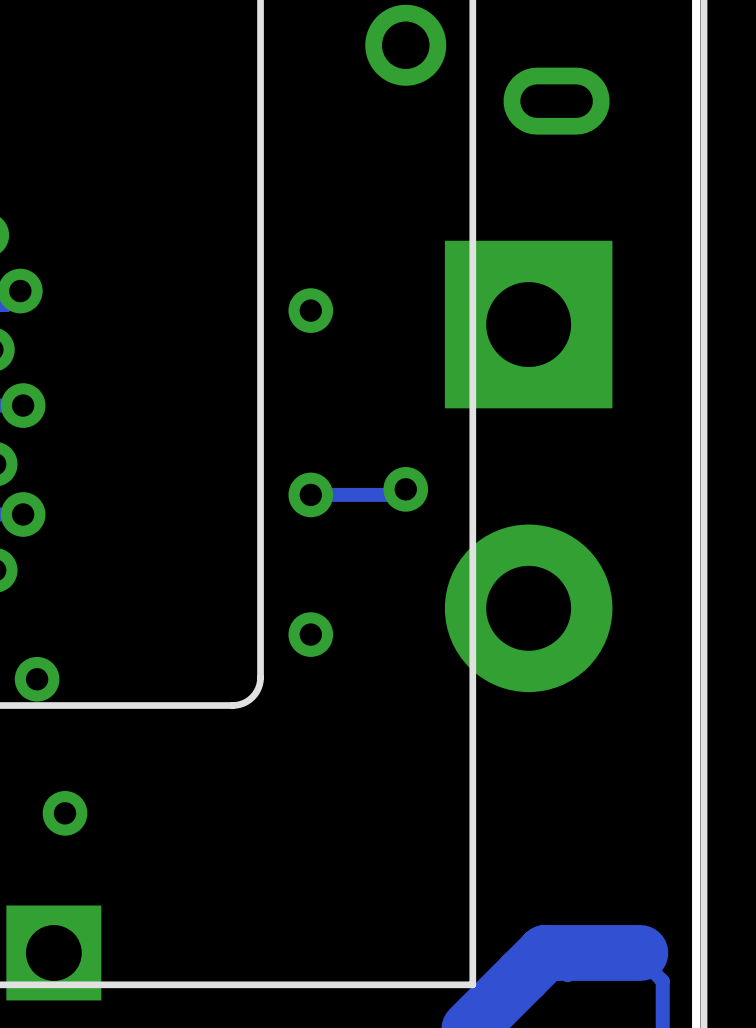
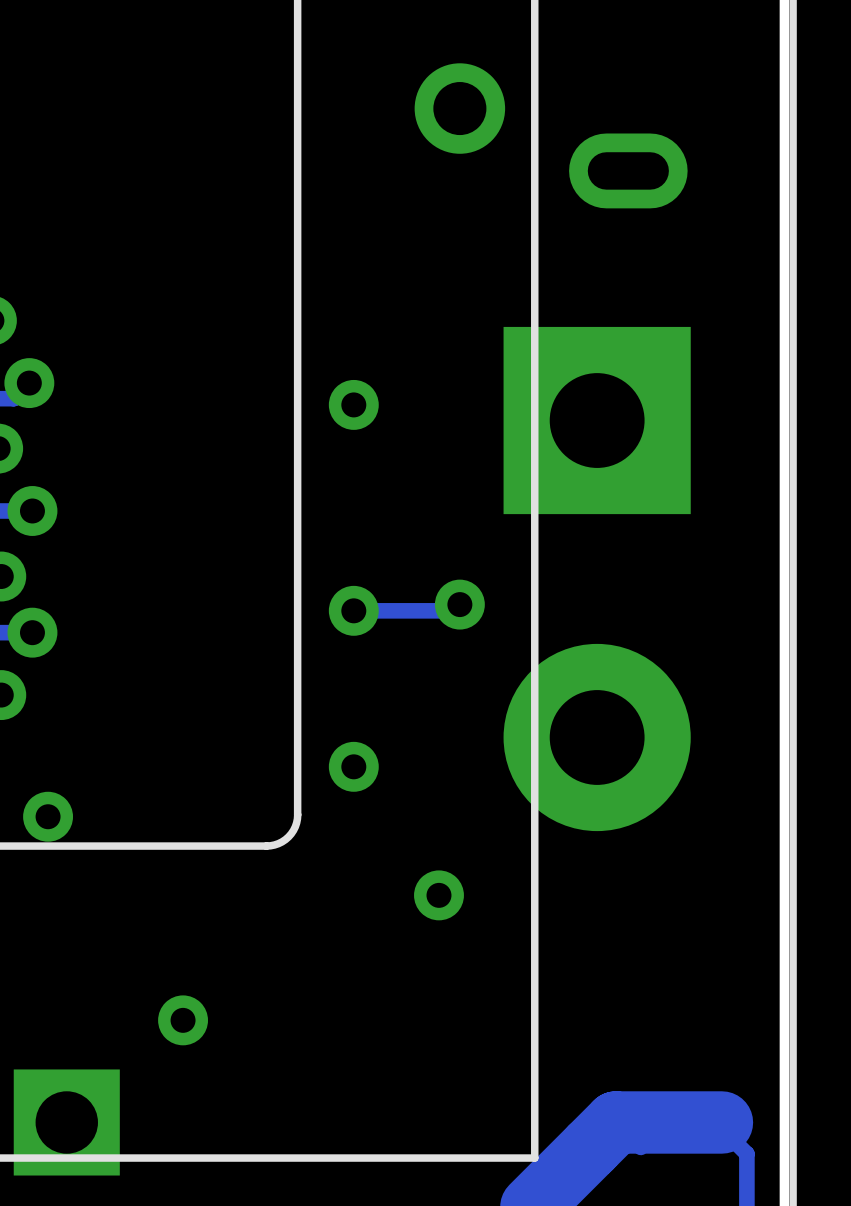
via: none -> (438, 895)
via position: (65, 813) -> (183, 1020)

